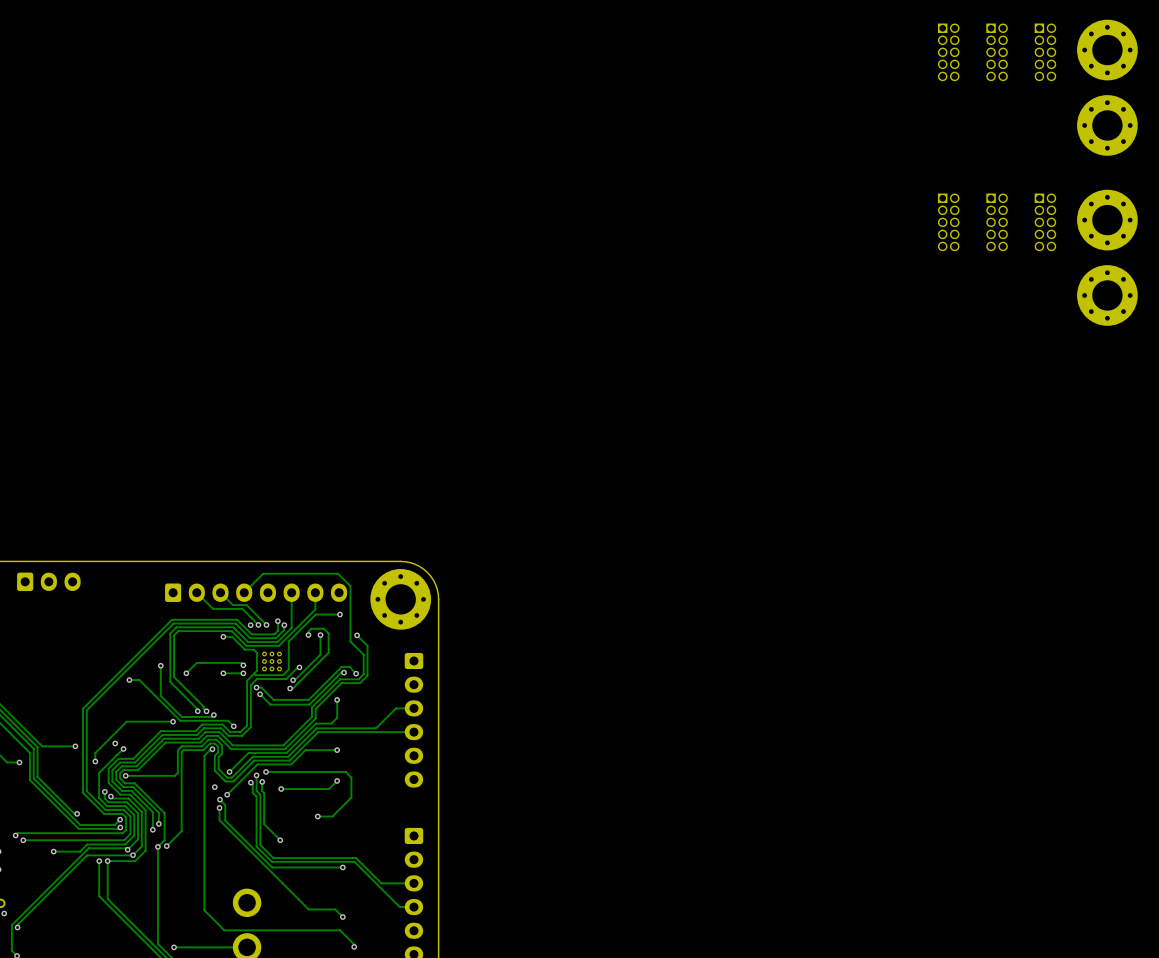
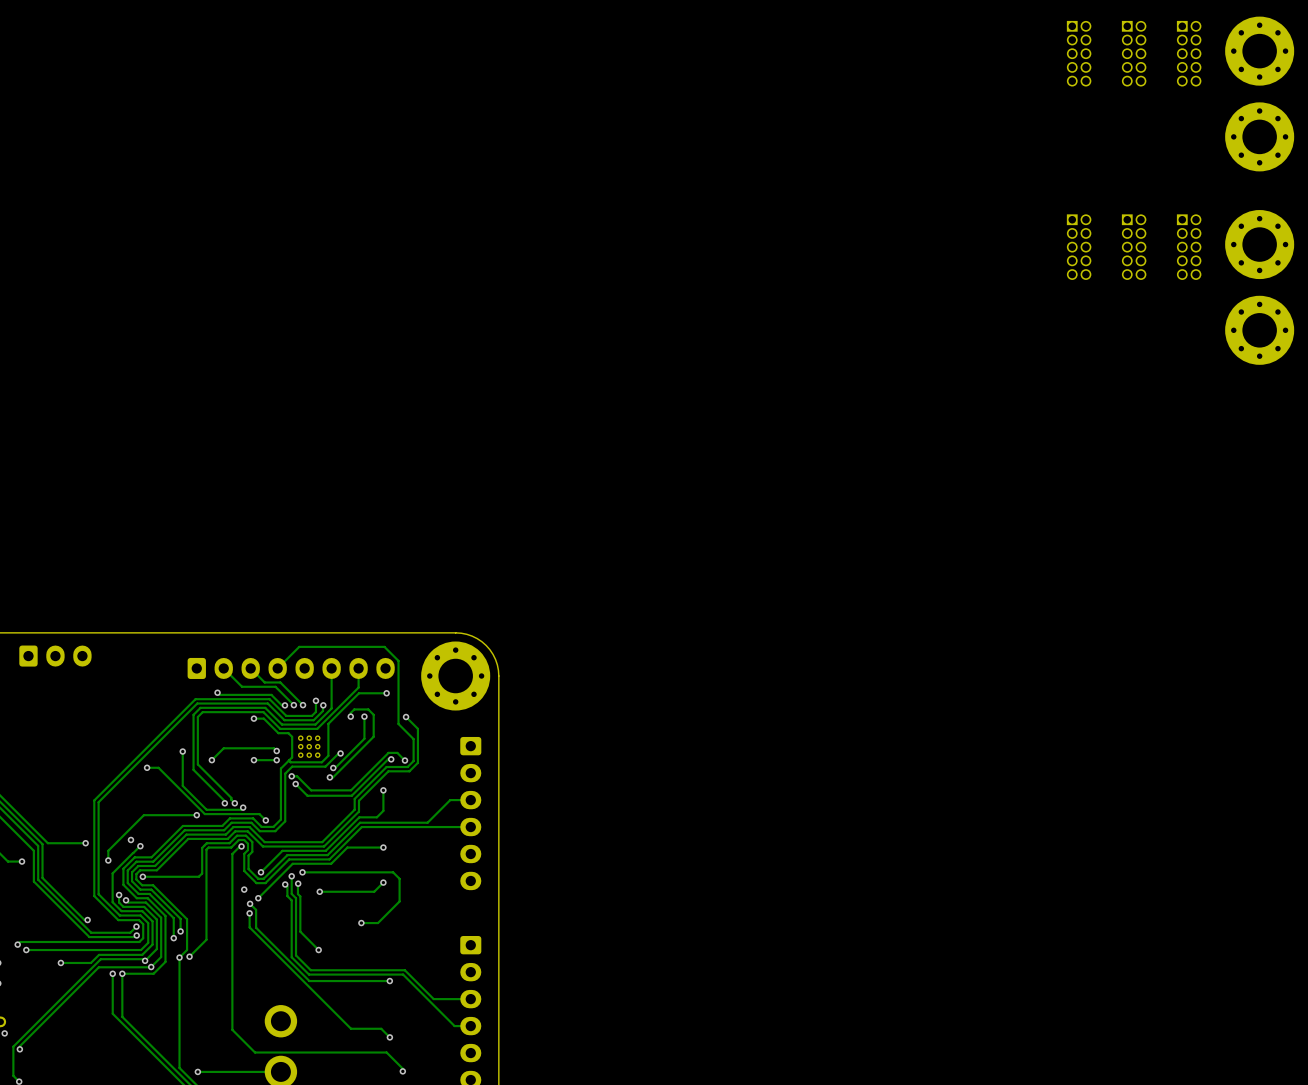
track: none -> (217, 692) (219, 694) (271, 694) (281, 705) (284, 705)
via: none -> (217, 692)

